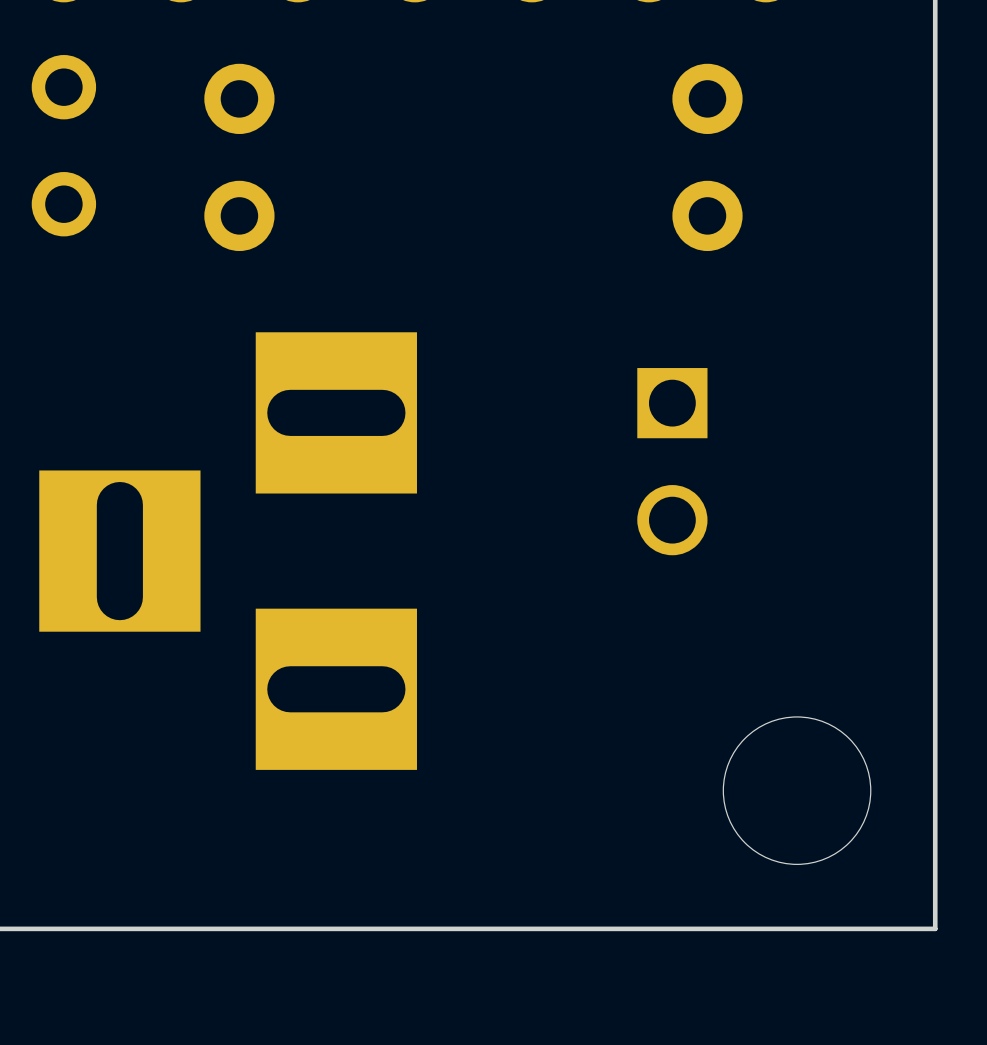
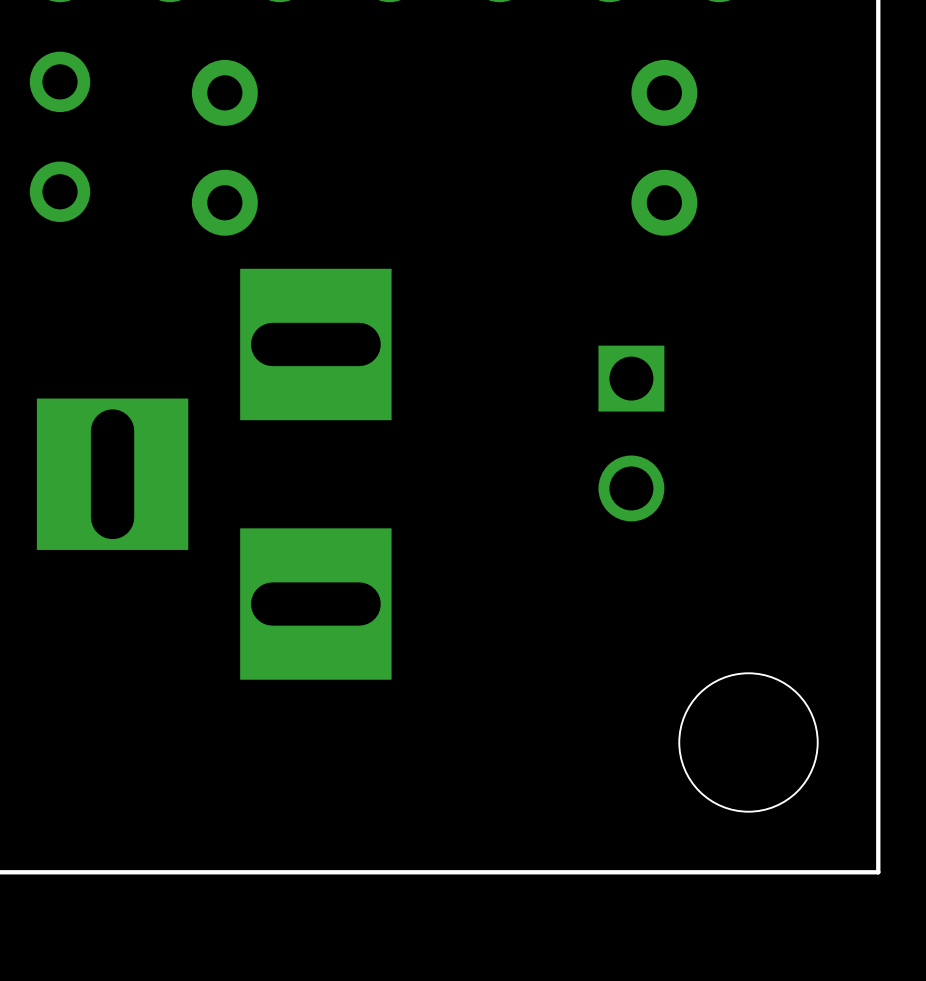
part position: (228, 551) -> (214, 474)

